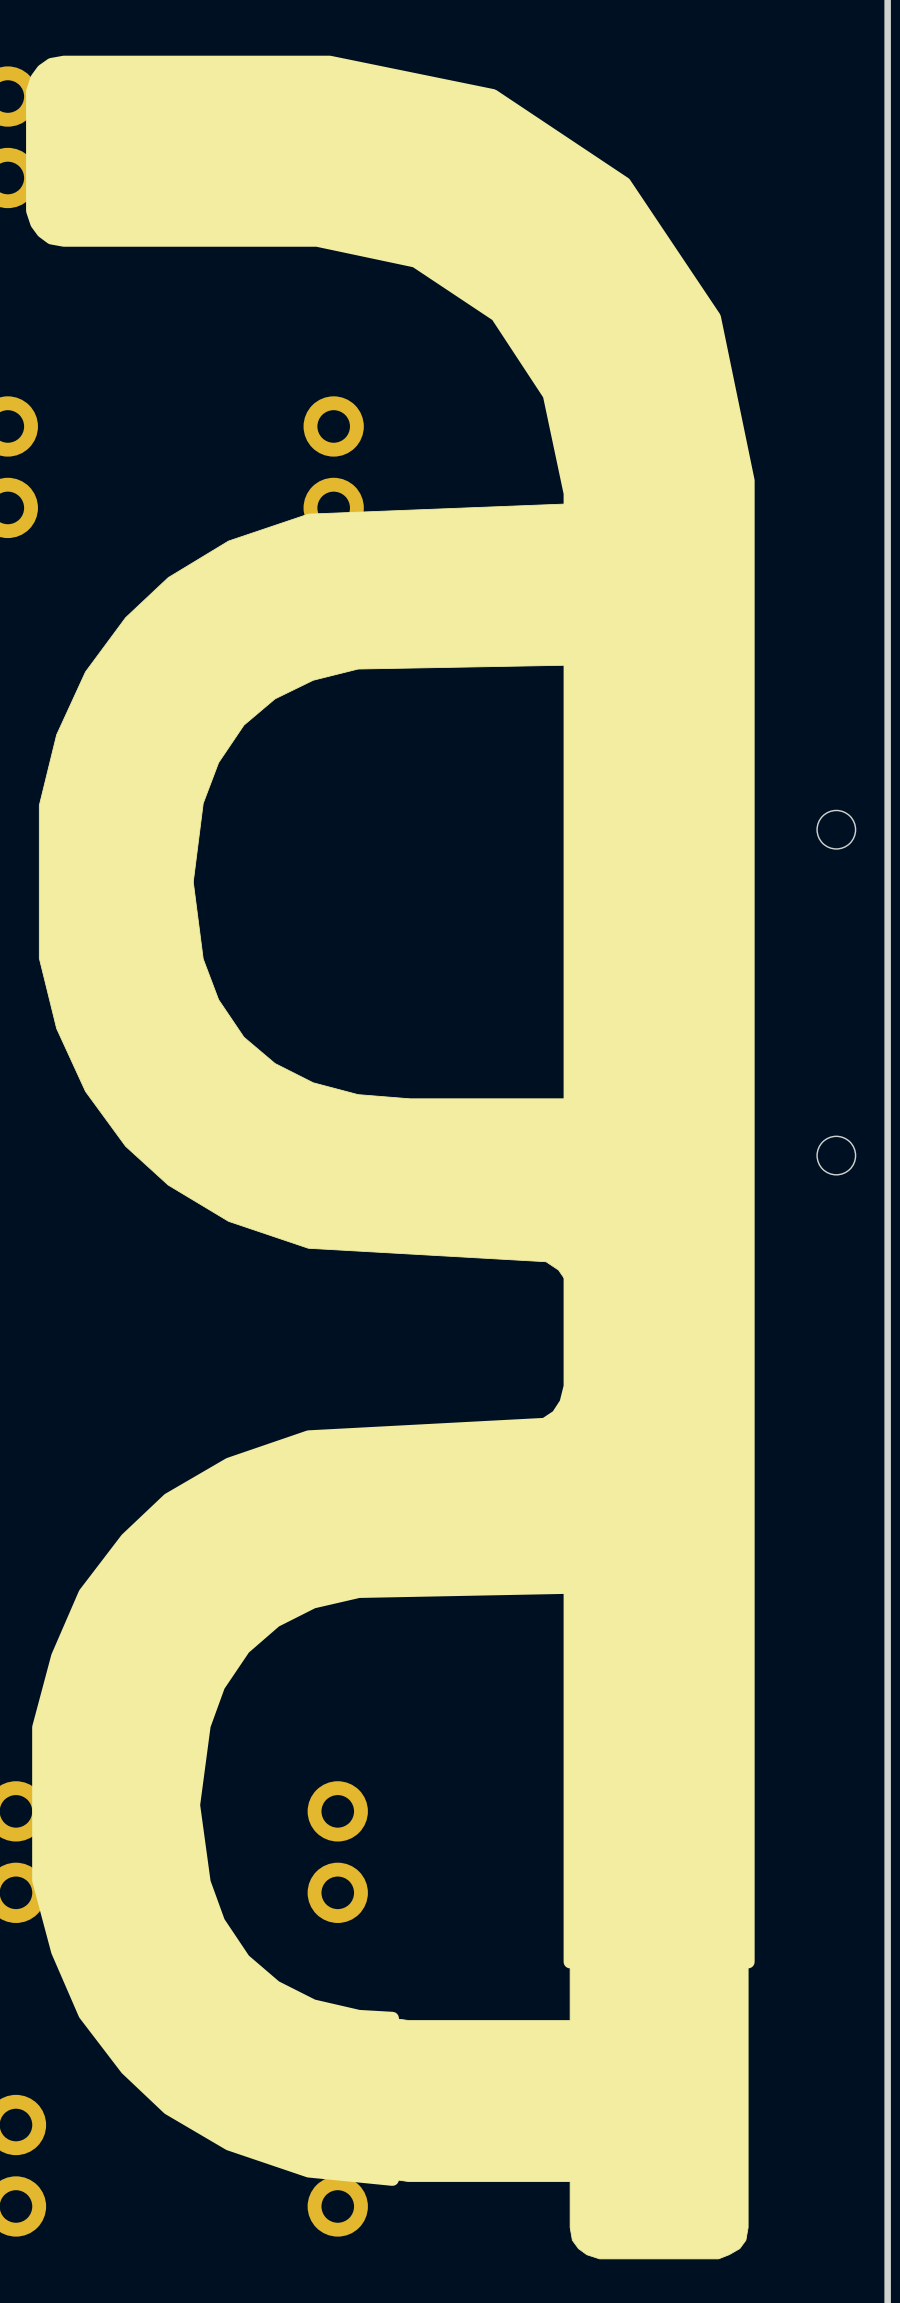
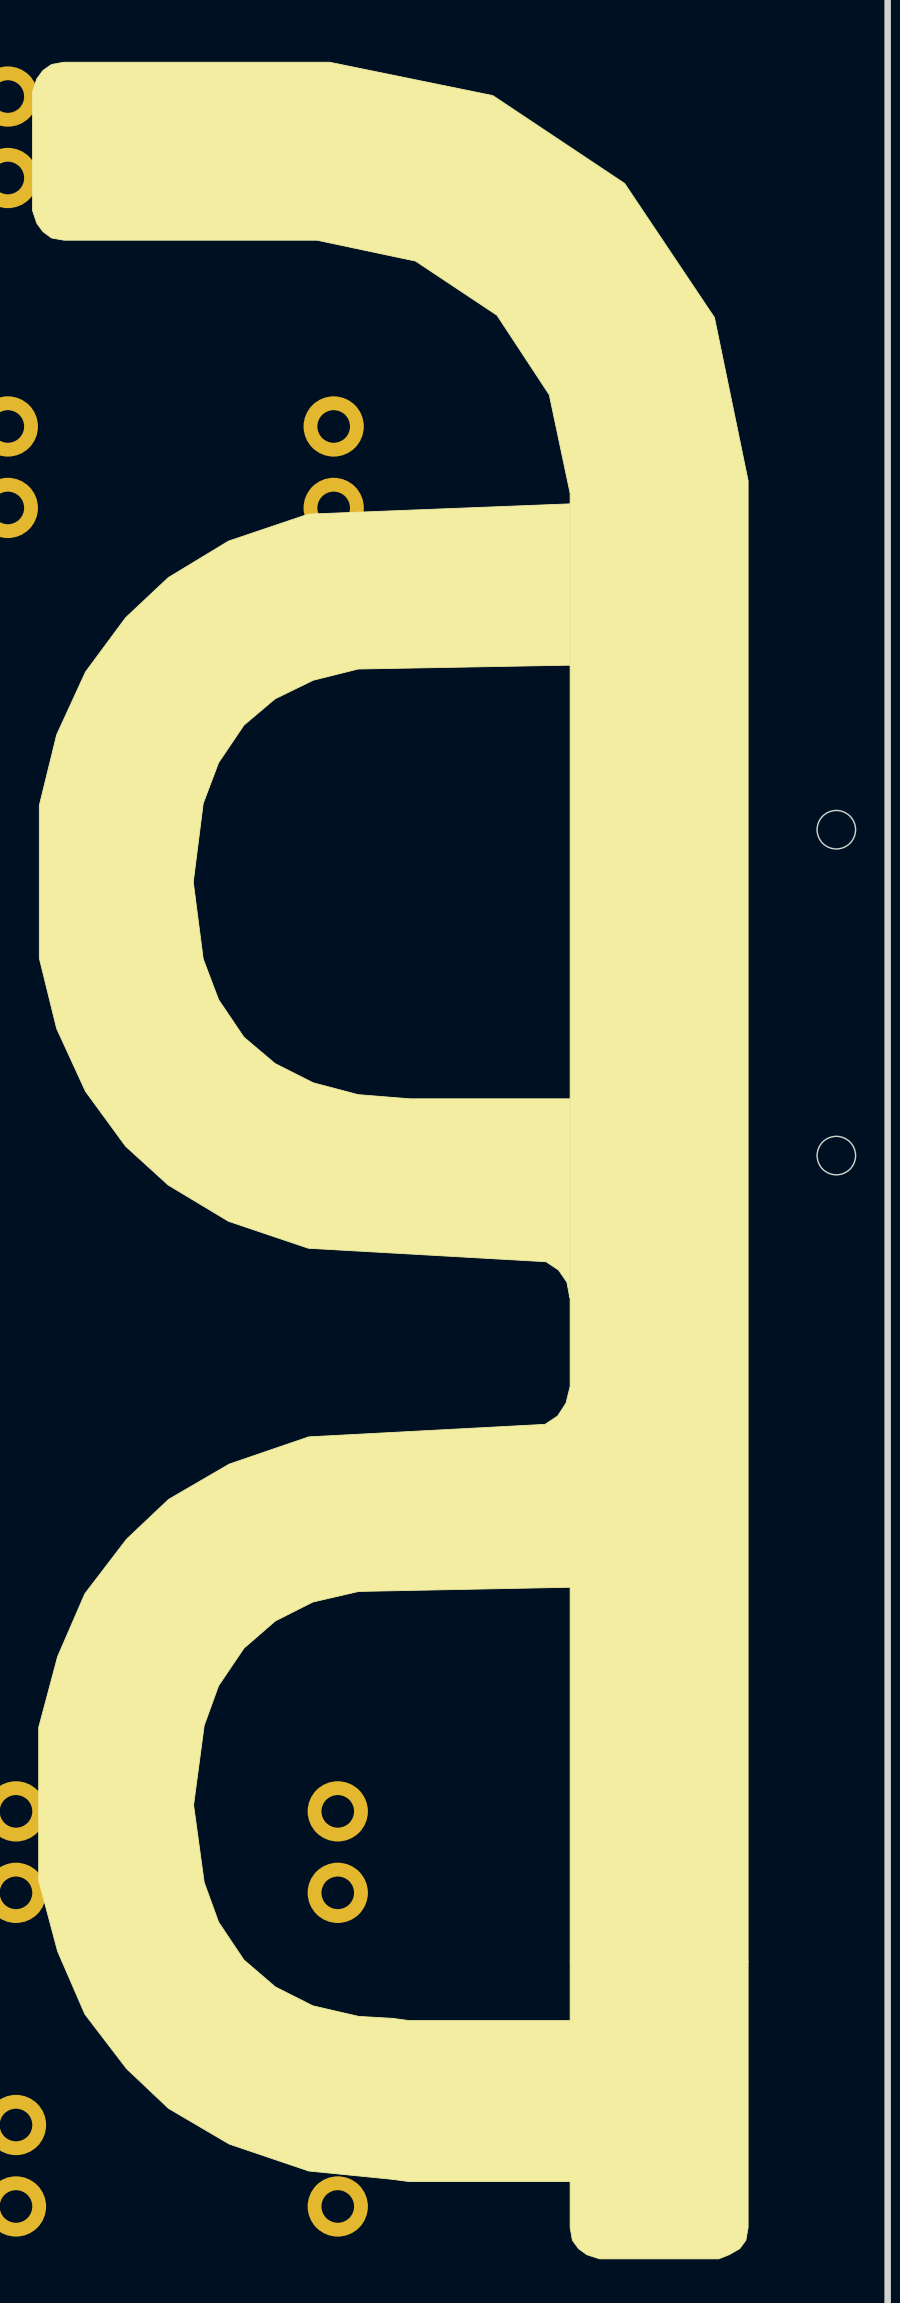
drawing shape: [26, 55, 755, 2186] -> [32, 61, 749, 2180]

